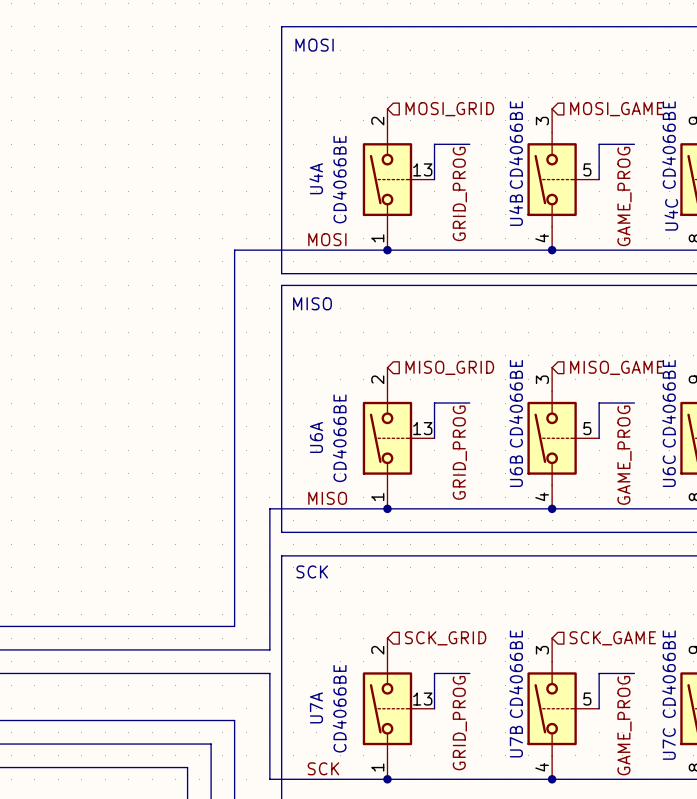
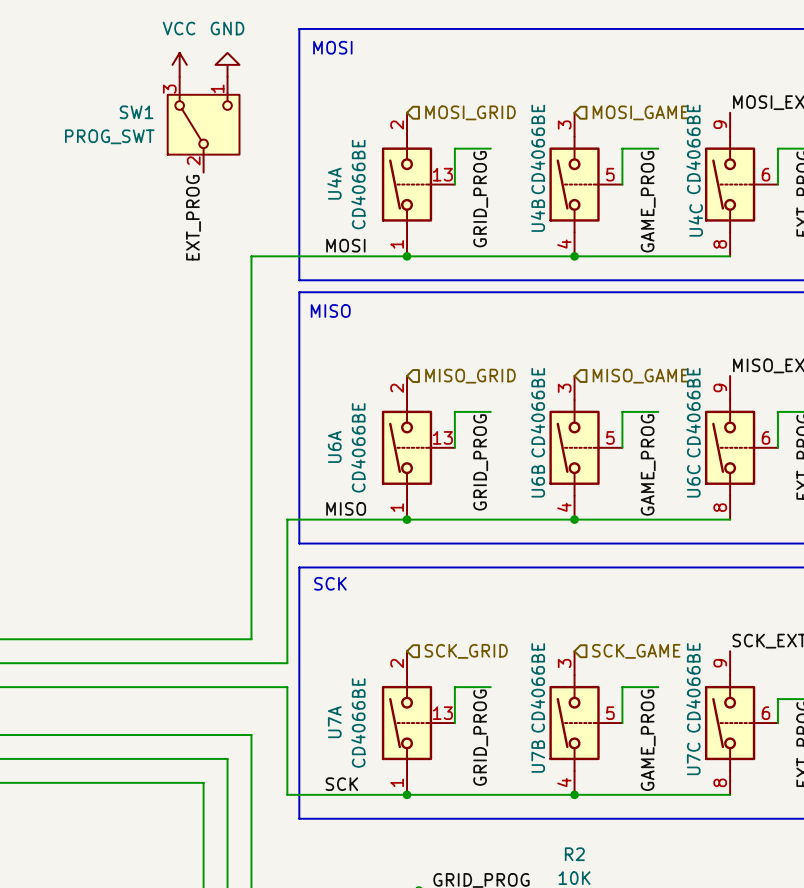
power symbol: none -> VCC (179, 64)
power symbol: none -> GND (227, 64)
SW1: none -> PROG_SWT (203, 124)
label: none -> EXT_PROG (193, 217)

